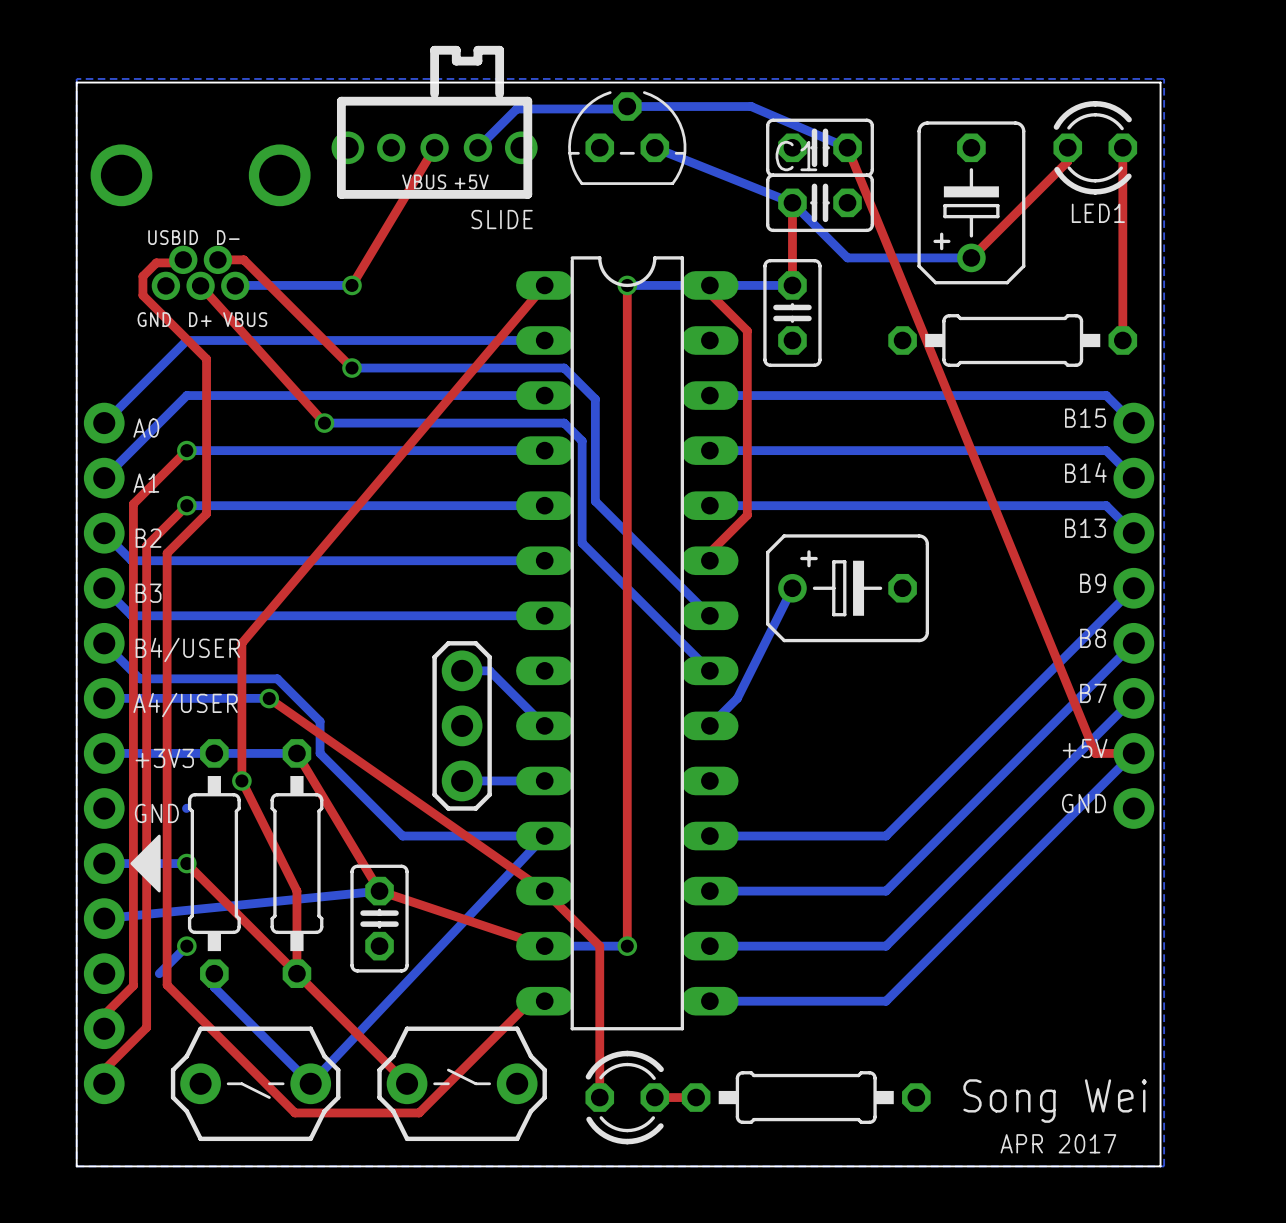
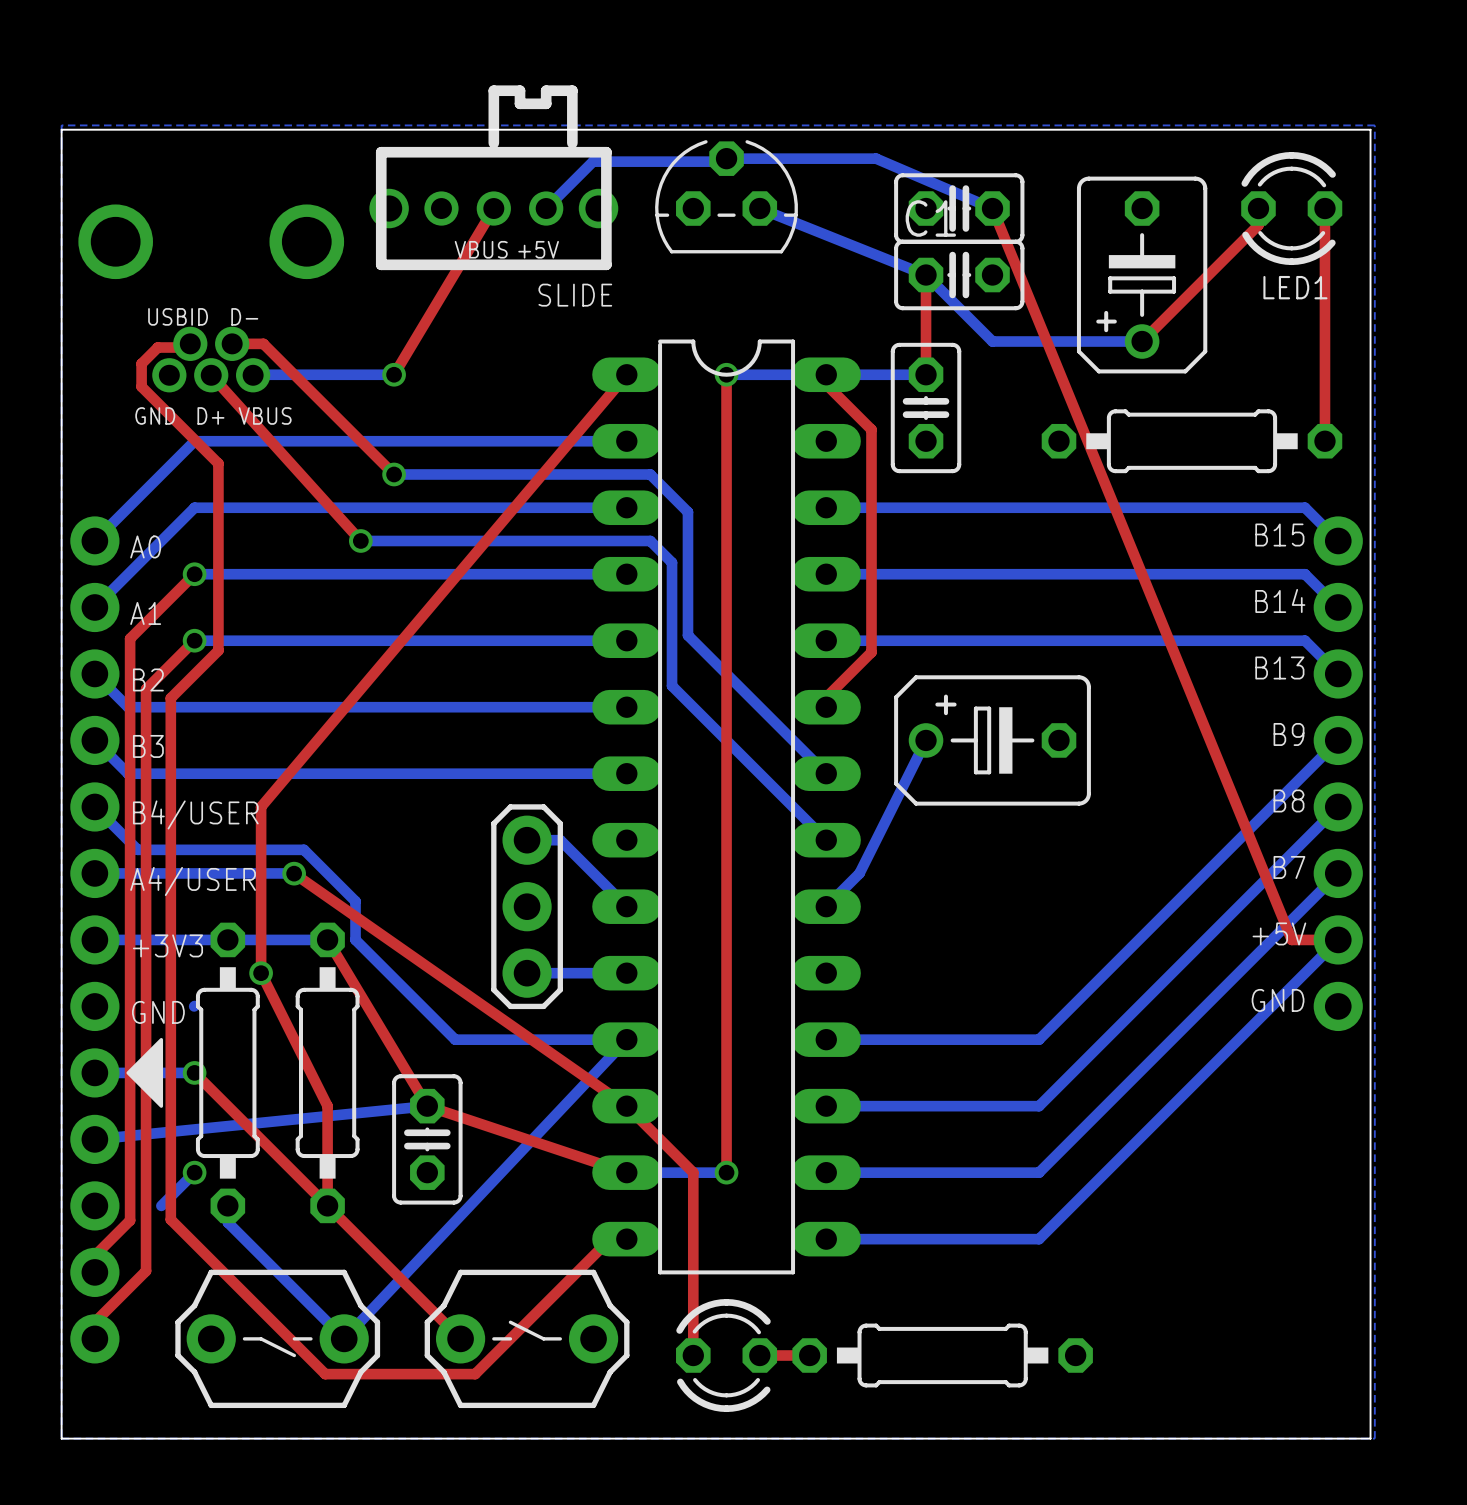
text: Song Wei (1055, 1101) -> none
text: APR 2017 (1058, 1143) -> none

